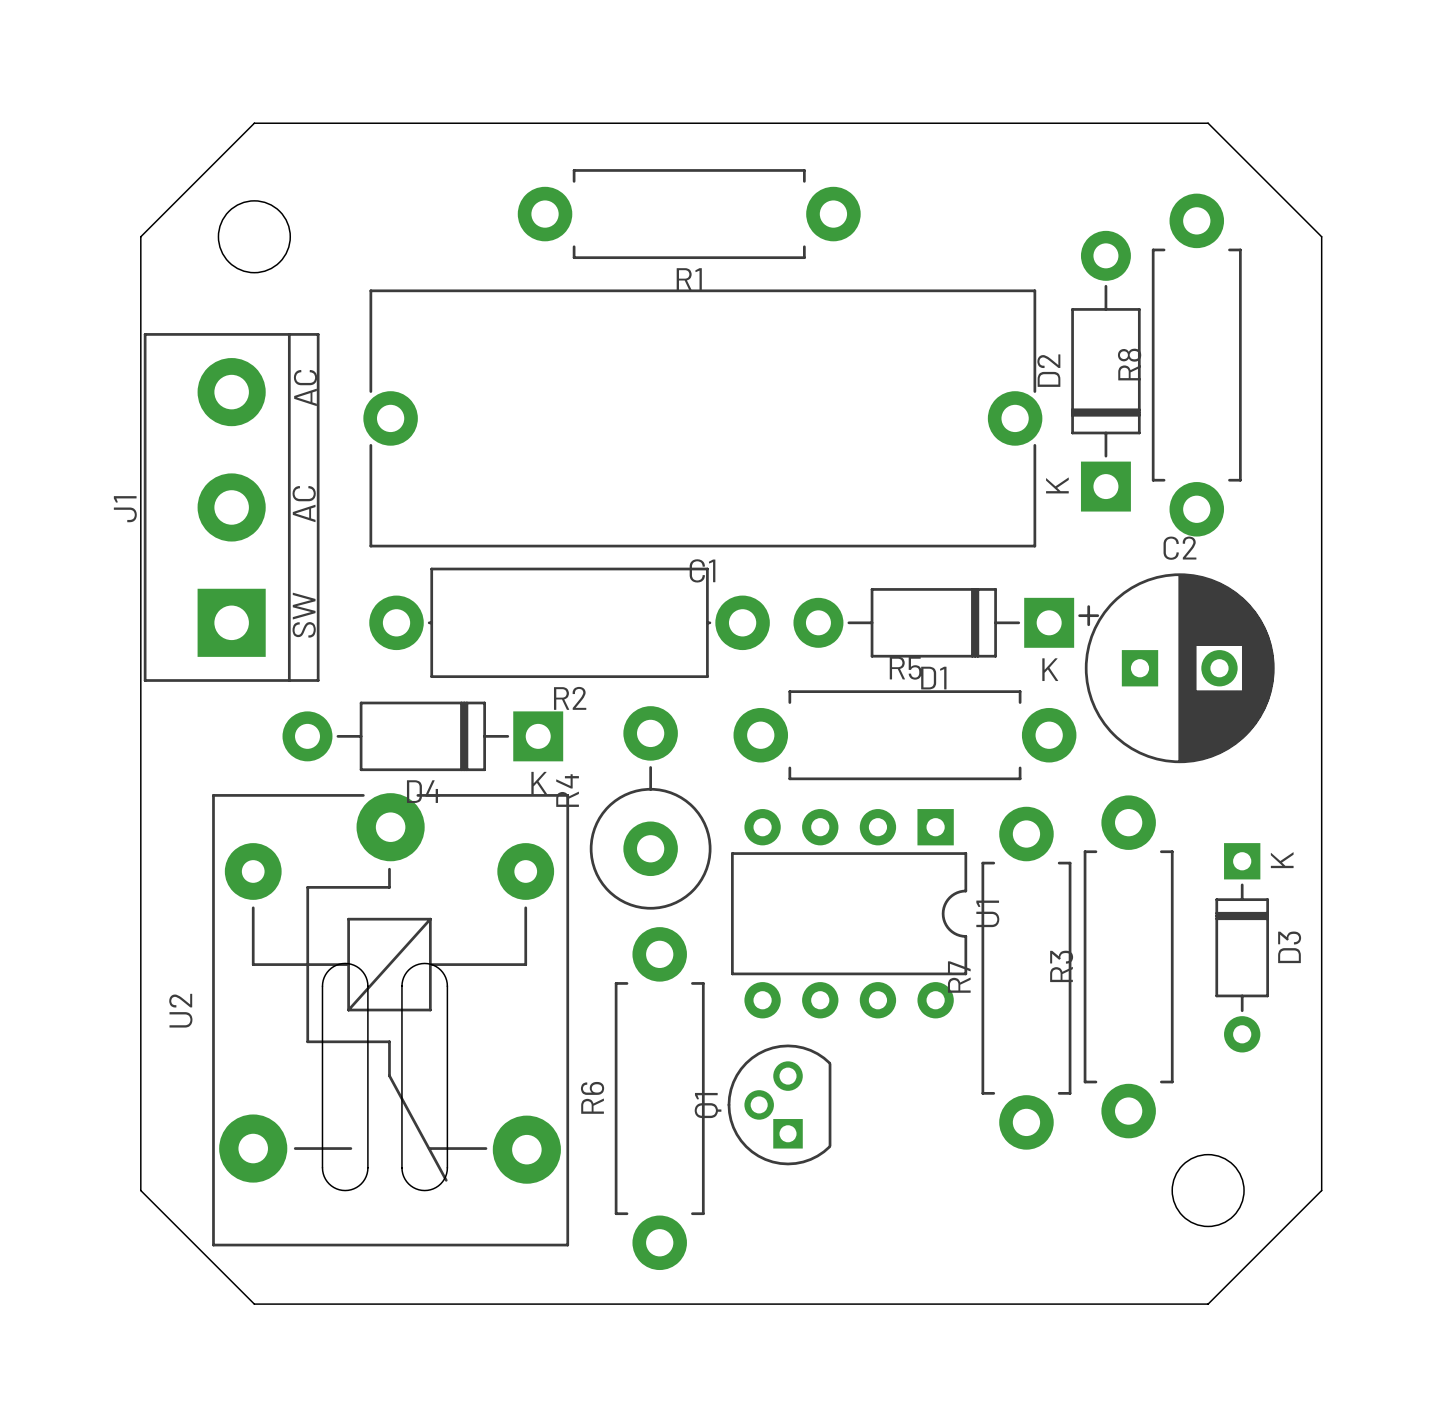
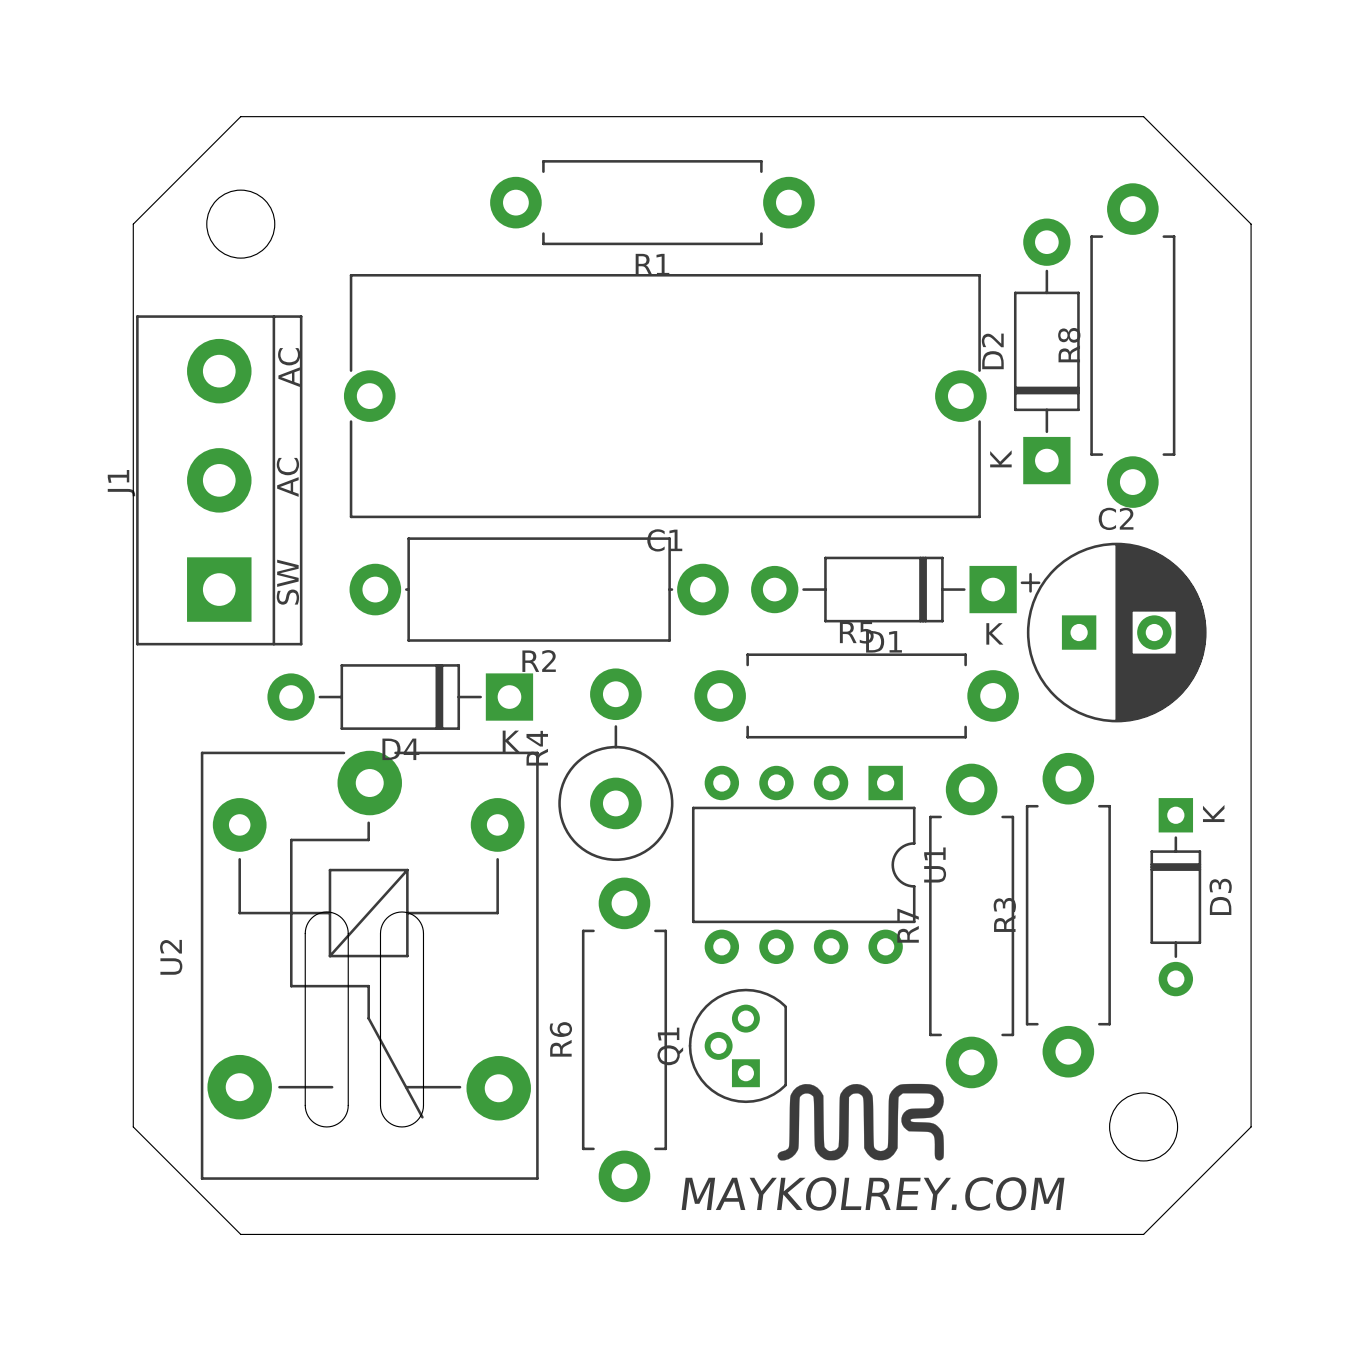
drawing: none -> [777, 1083, 944, 1161]
text: none -> MAYKOLREY.COM (873, 1193)

